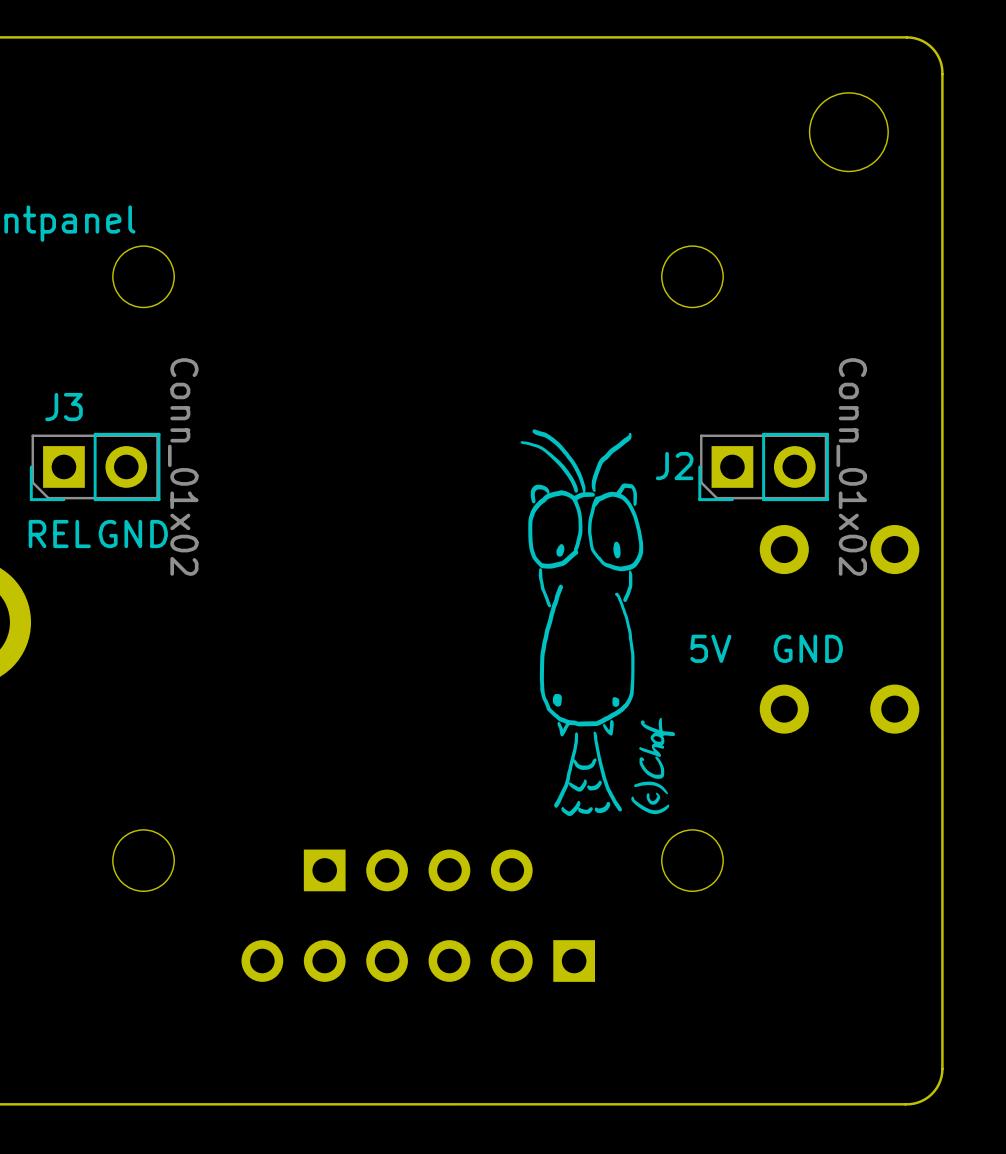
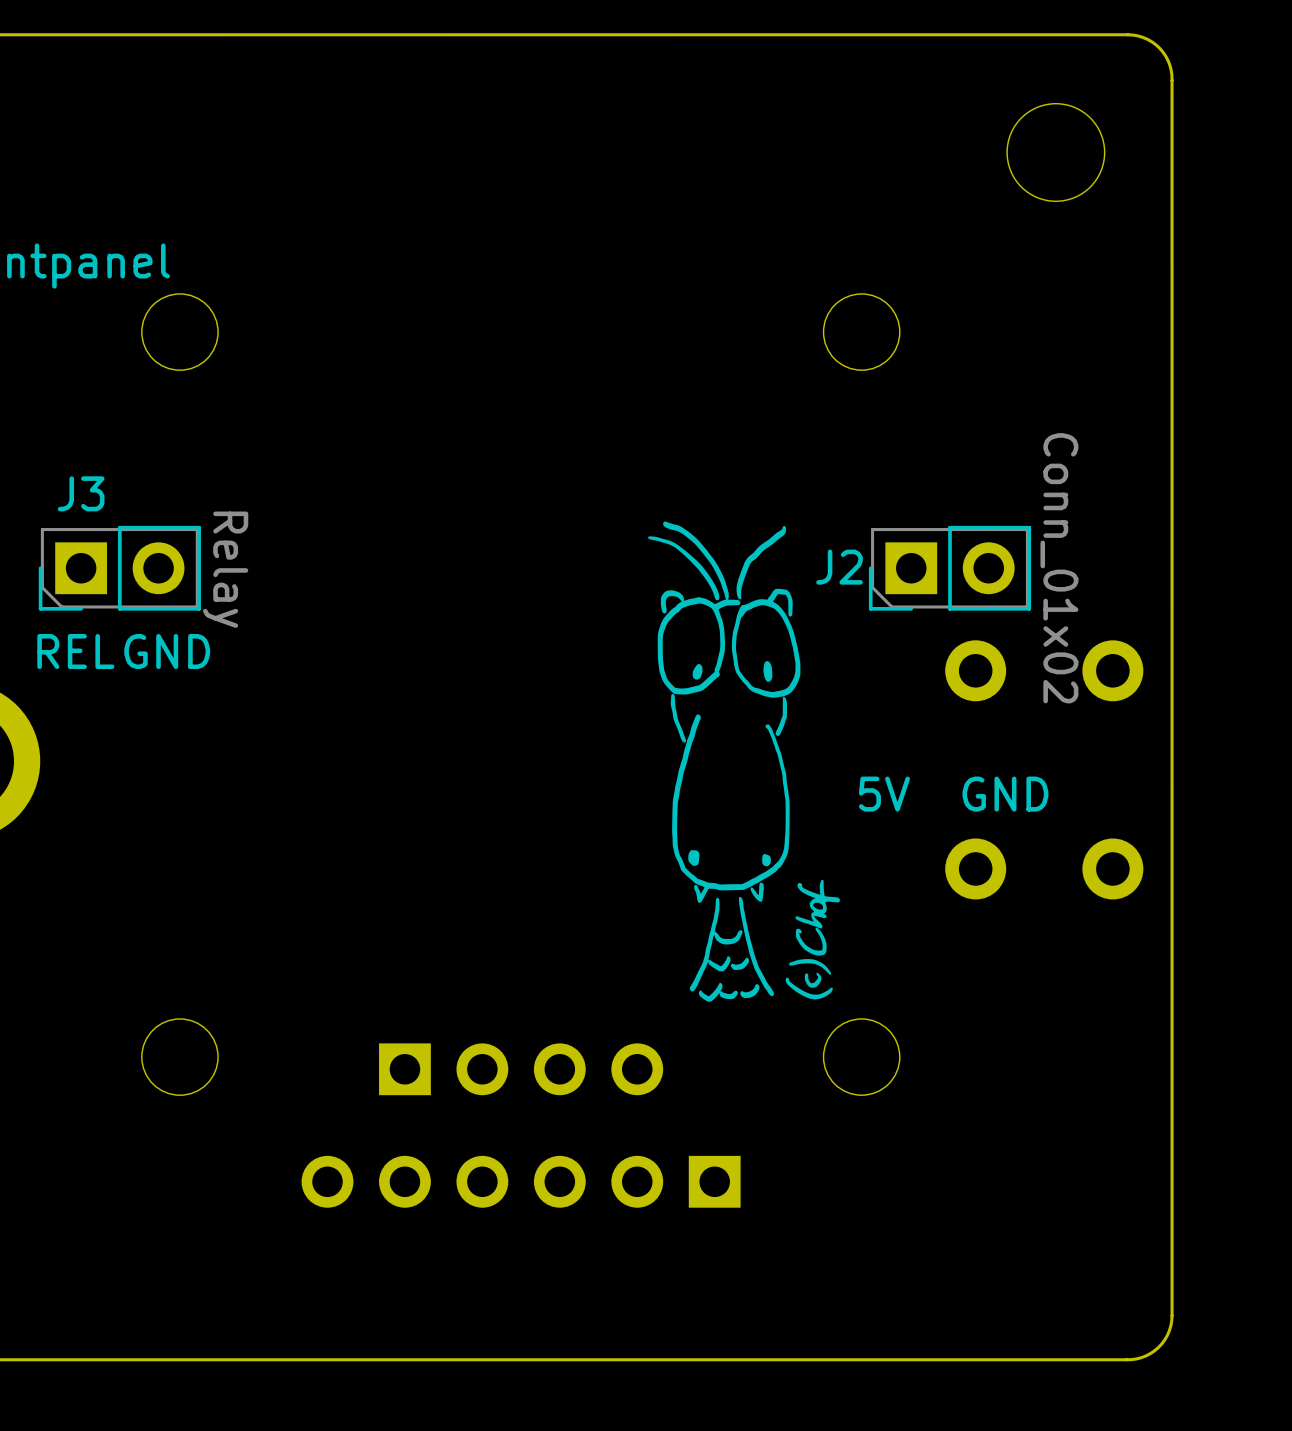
J3 value: Conn_01x02 (183, 466) -> Relay (225, 569)

